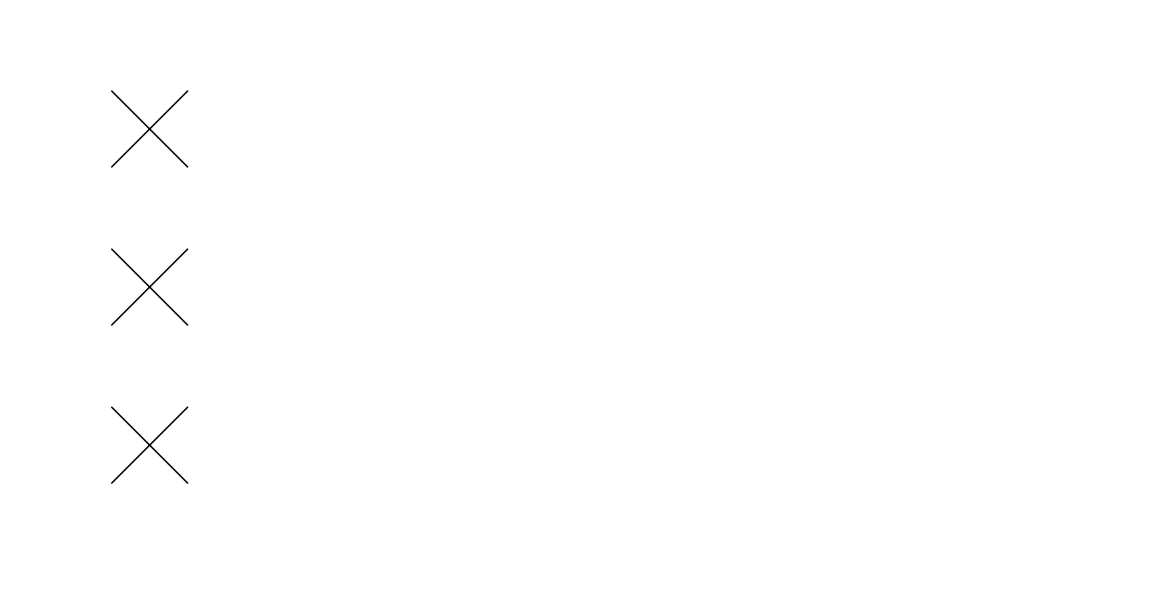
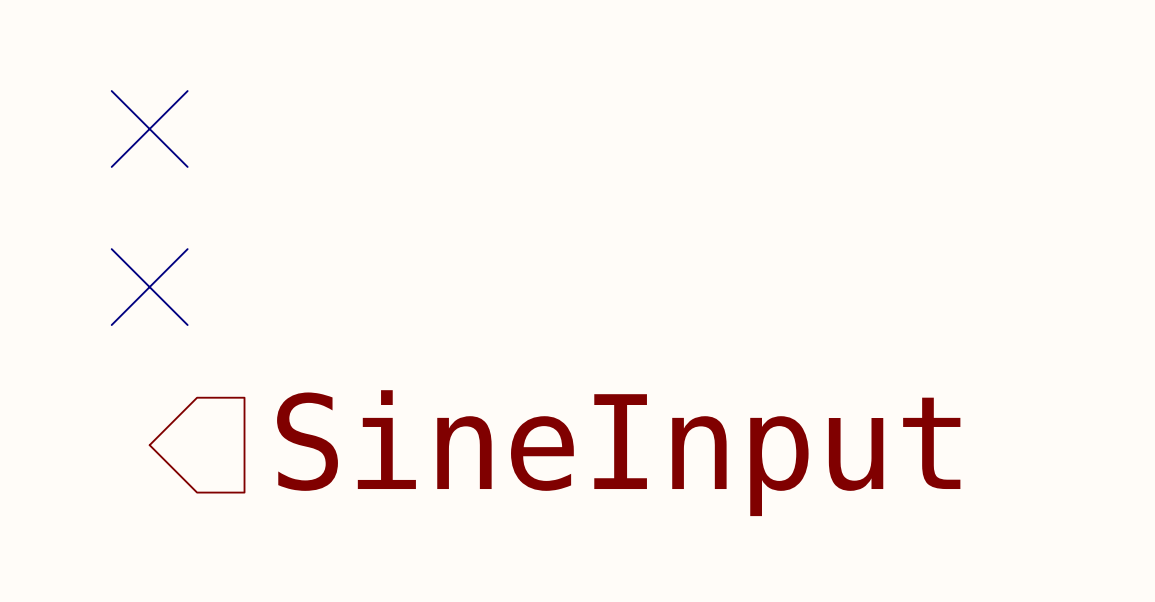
no-connect mark: (149, 445) -> none
hierarchical label: none -> SineInput (618, 453)

